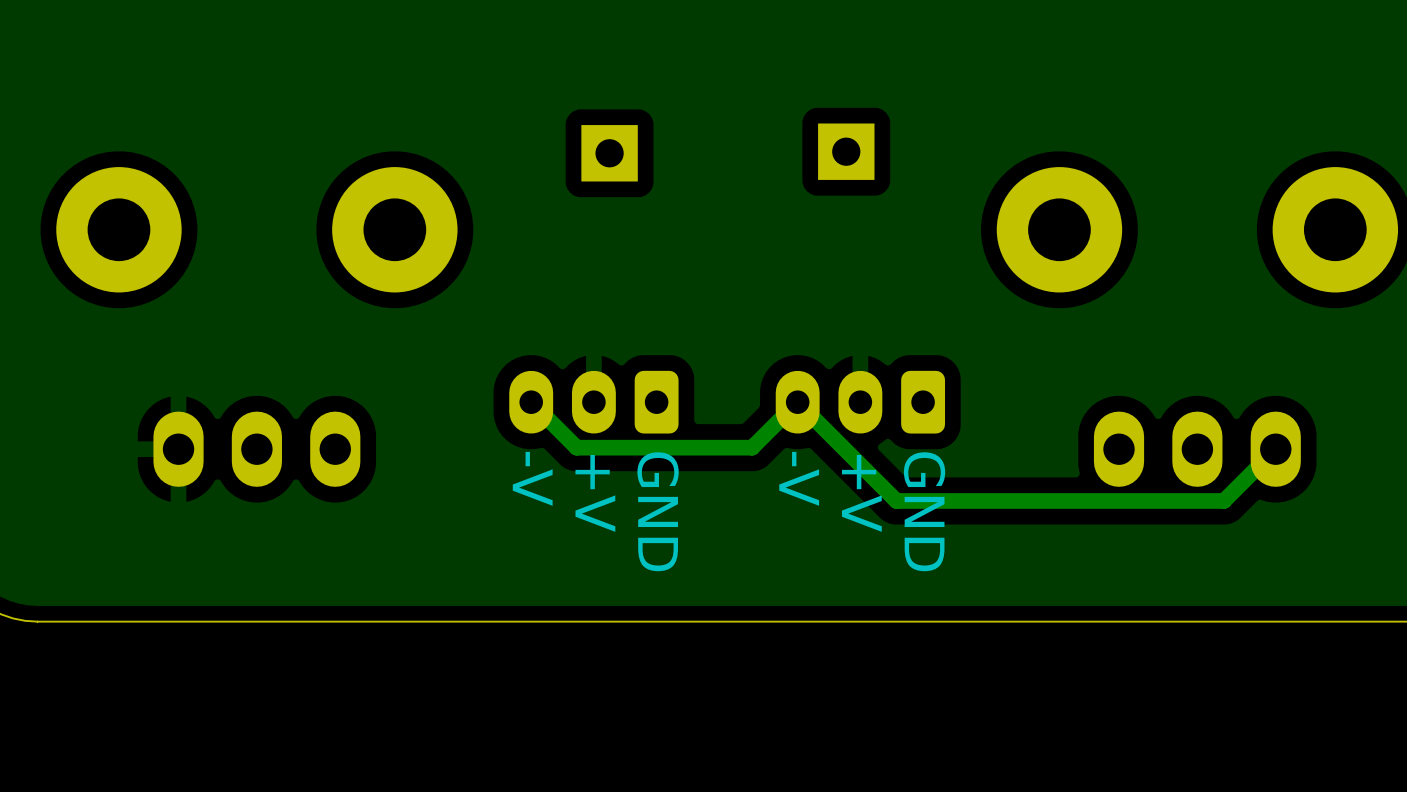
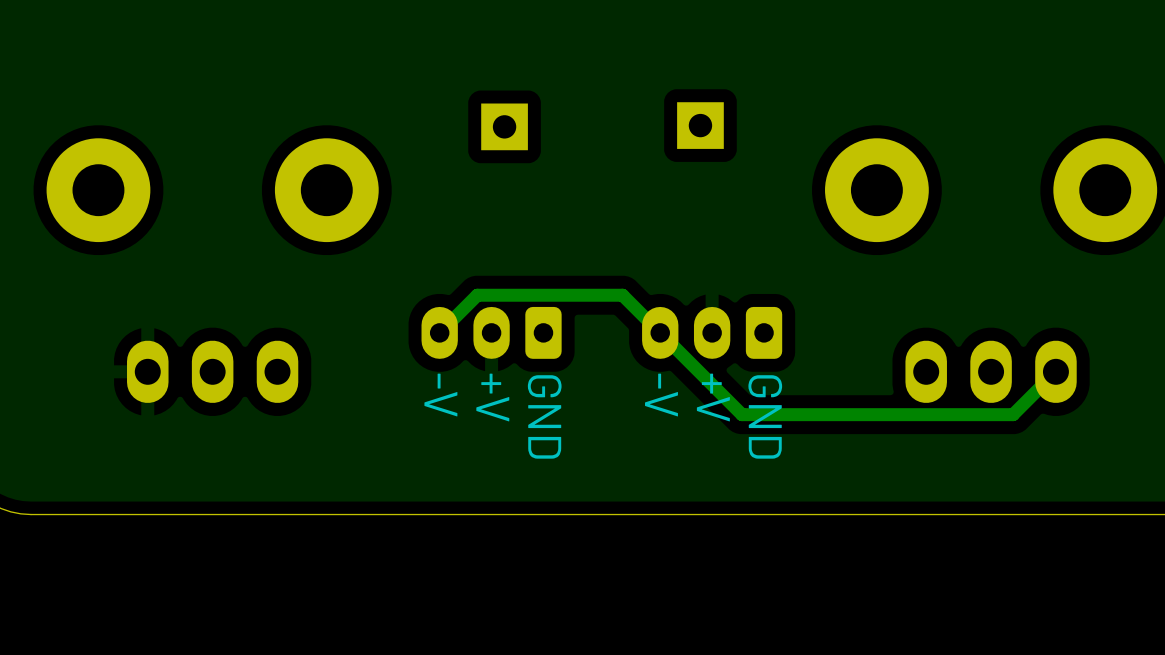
track: (797, 402) (752, 447) (576, 447) (531, 402) -> (660, 332) (622, 295) (477, 295) (439, 332)

